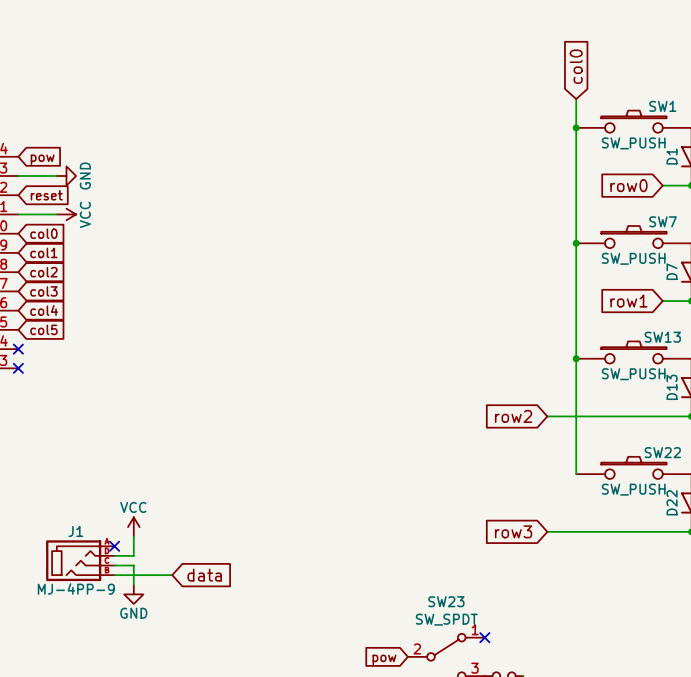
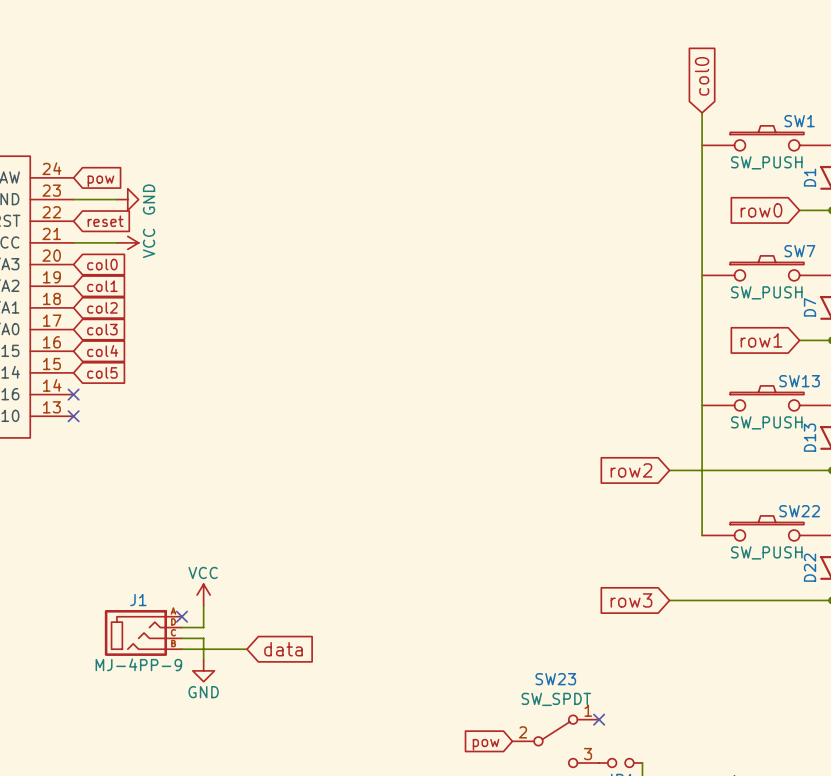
junction: (576, 127) -> none
junction: (576, 243) -> none
junction: (576, 358) -> none

